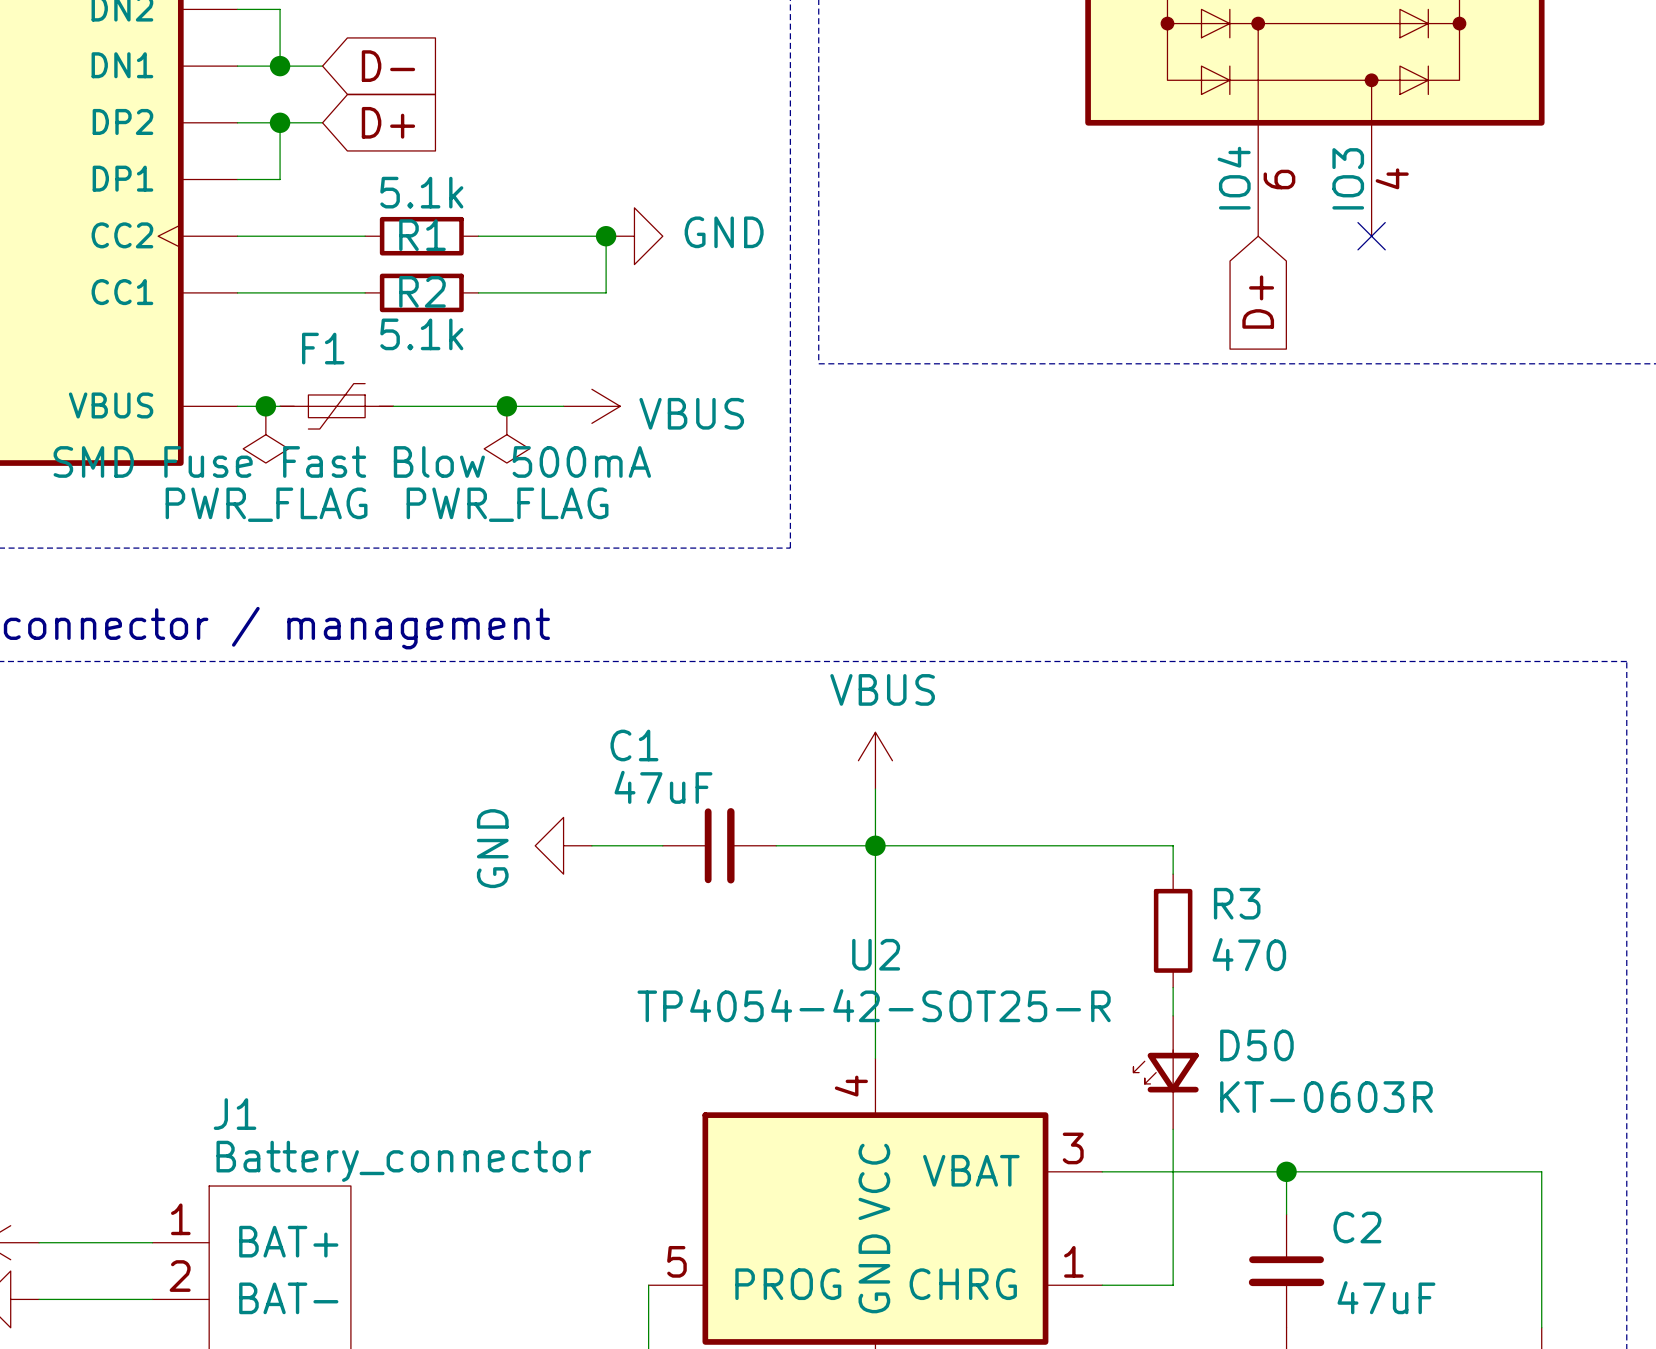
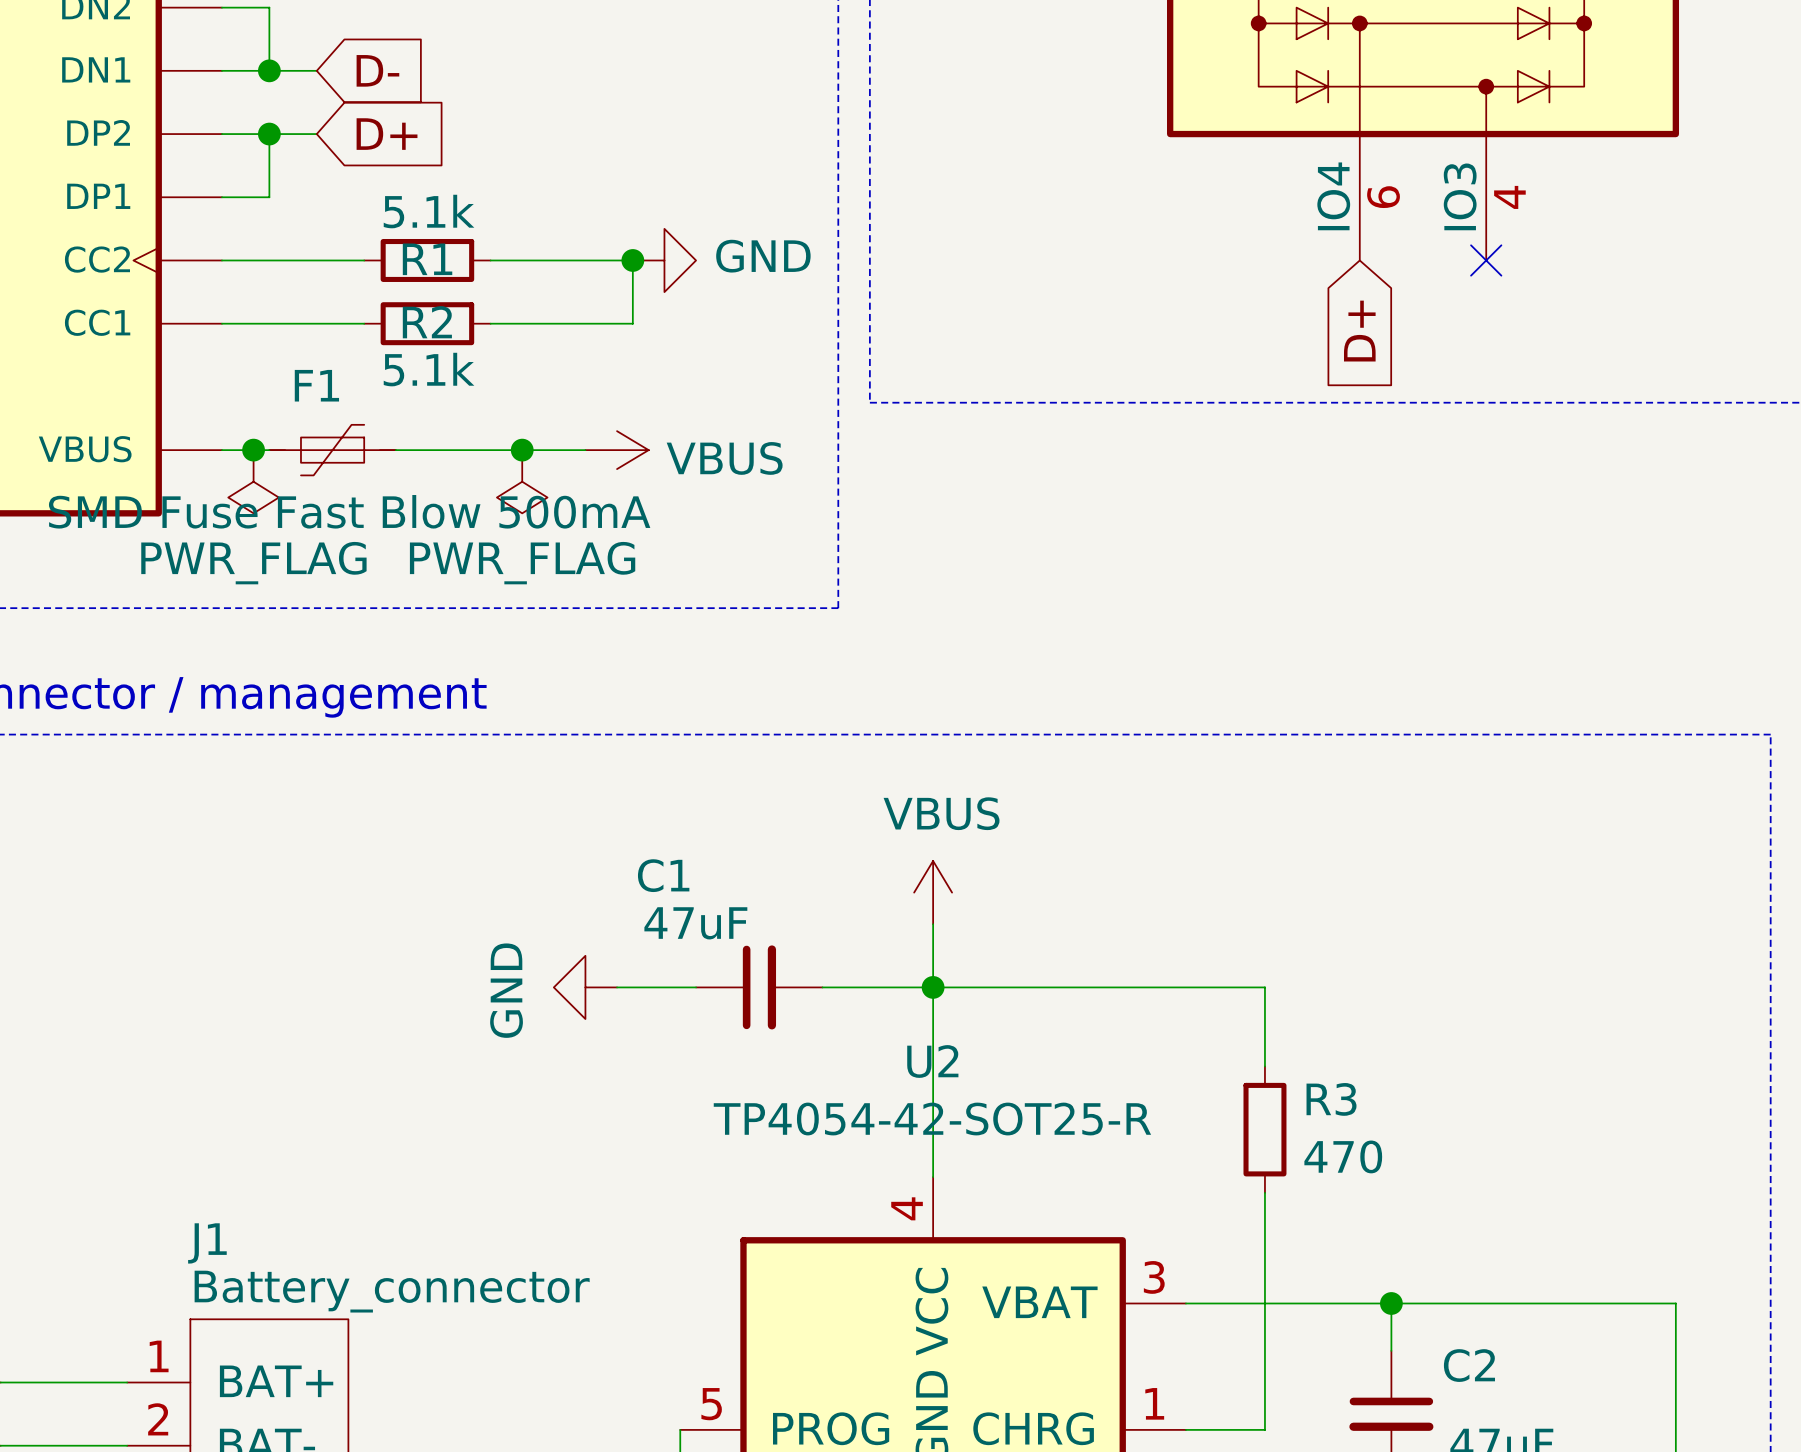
power symbol position: VBUS (875, 760) -> VBUS (933, 892)
power symbol position: GND (563, 845) -> GND (585, 987)
wire: (591, 845) (662, 845) -> (617, 987) (696, 987)
C1 position: (719, 845) -> (759, 987)
wire: (776, 845) (1173, 845) (1173, 874) -> none
junction position: (875, 845) -> (933, 987)
wire: none -> (822, 987) (1264, 987) (1264, 1066)
R3 position: (1173, 930) -> (1264, 1129)
wire: (1173, 987) (1173, 1015) -> none
D50: KT-0603R (1166, 1072) -> none

